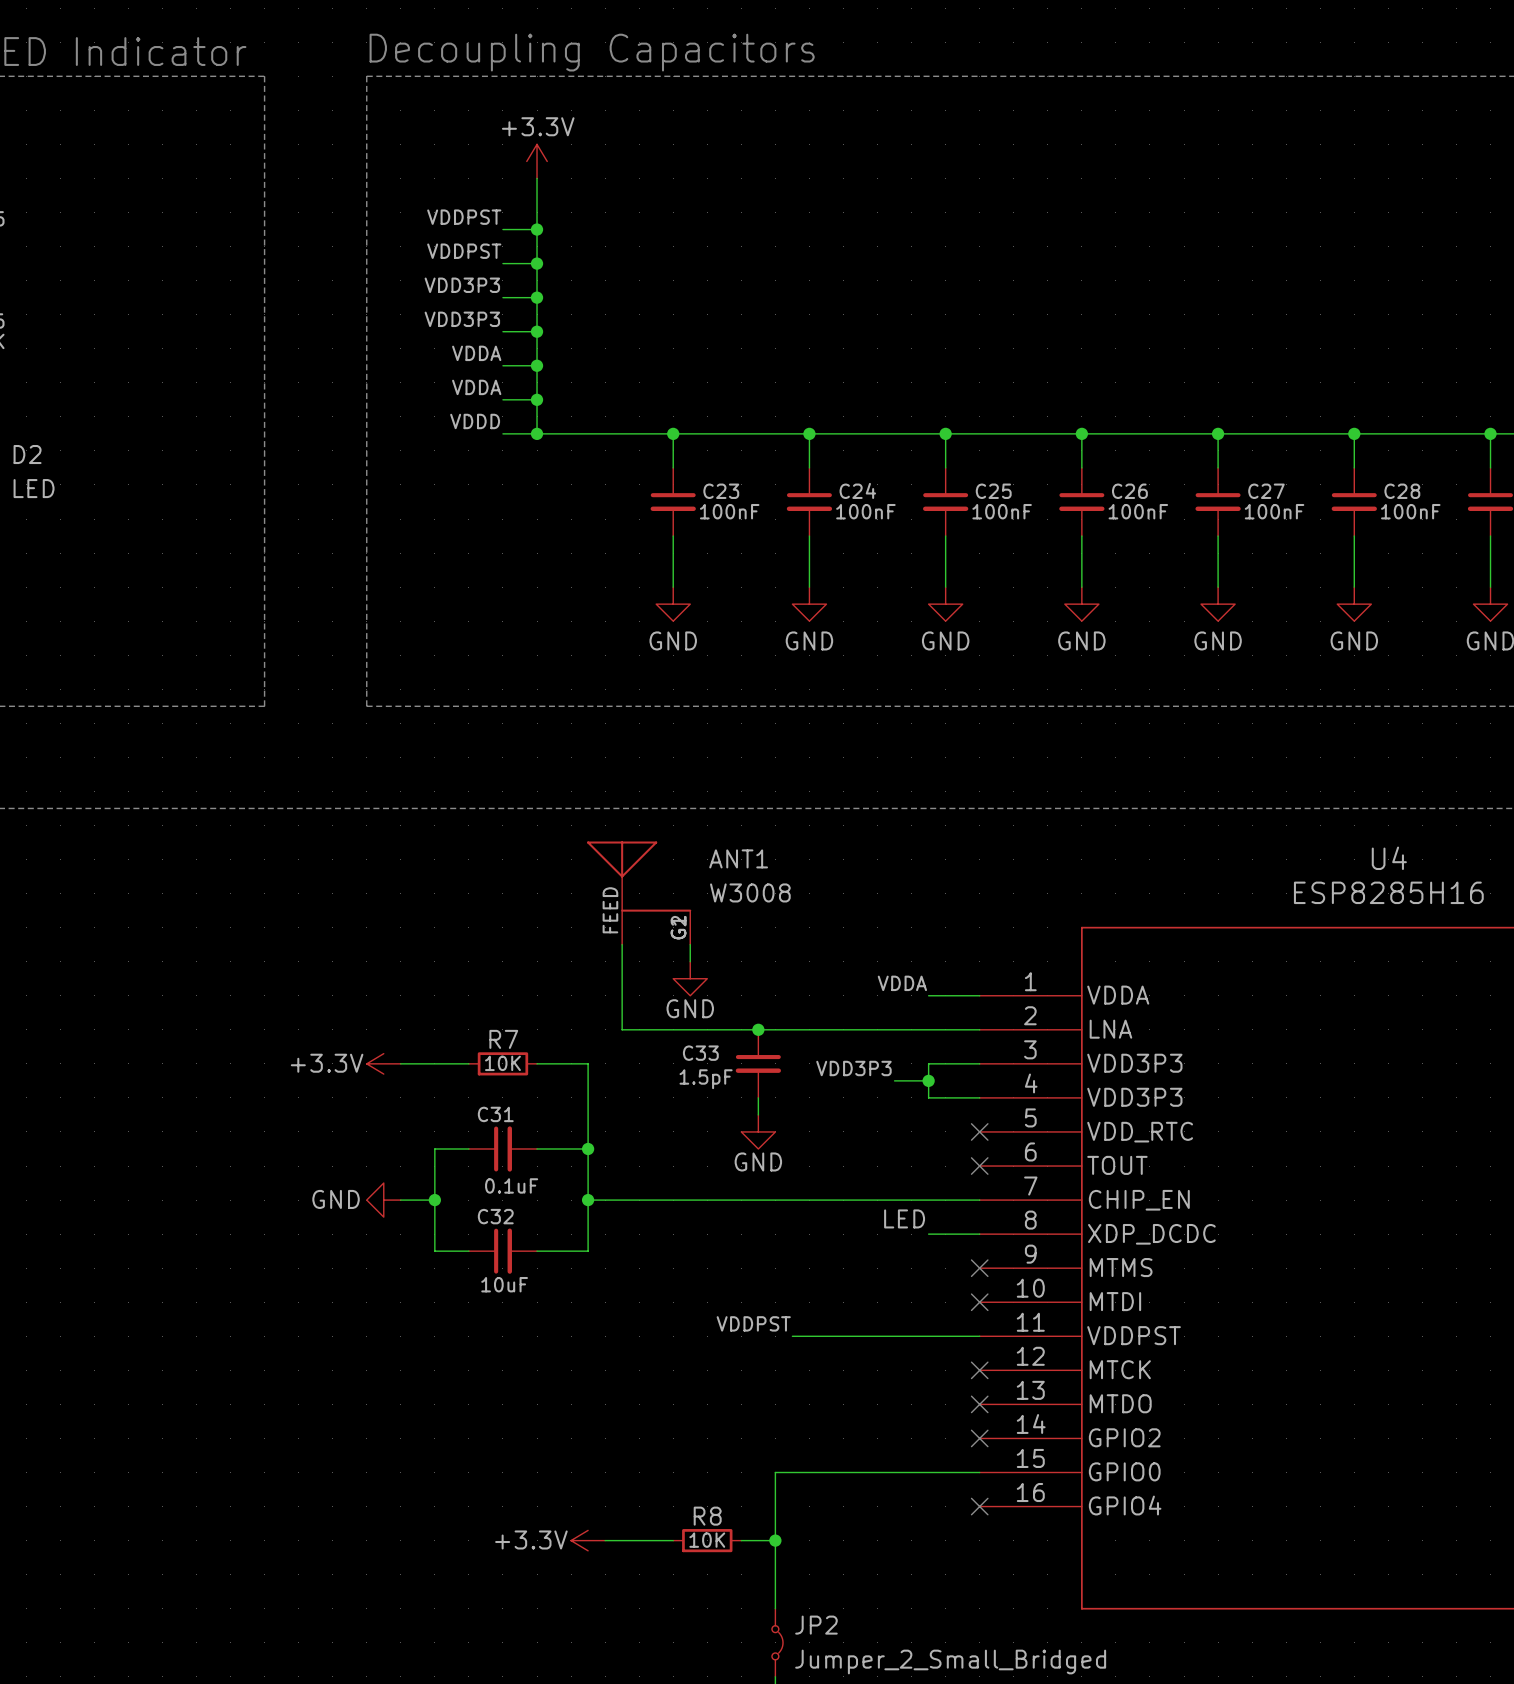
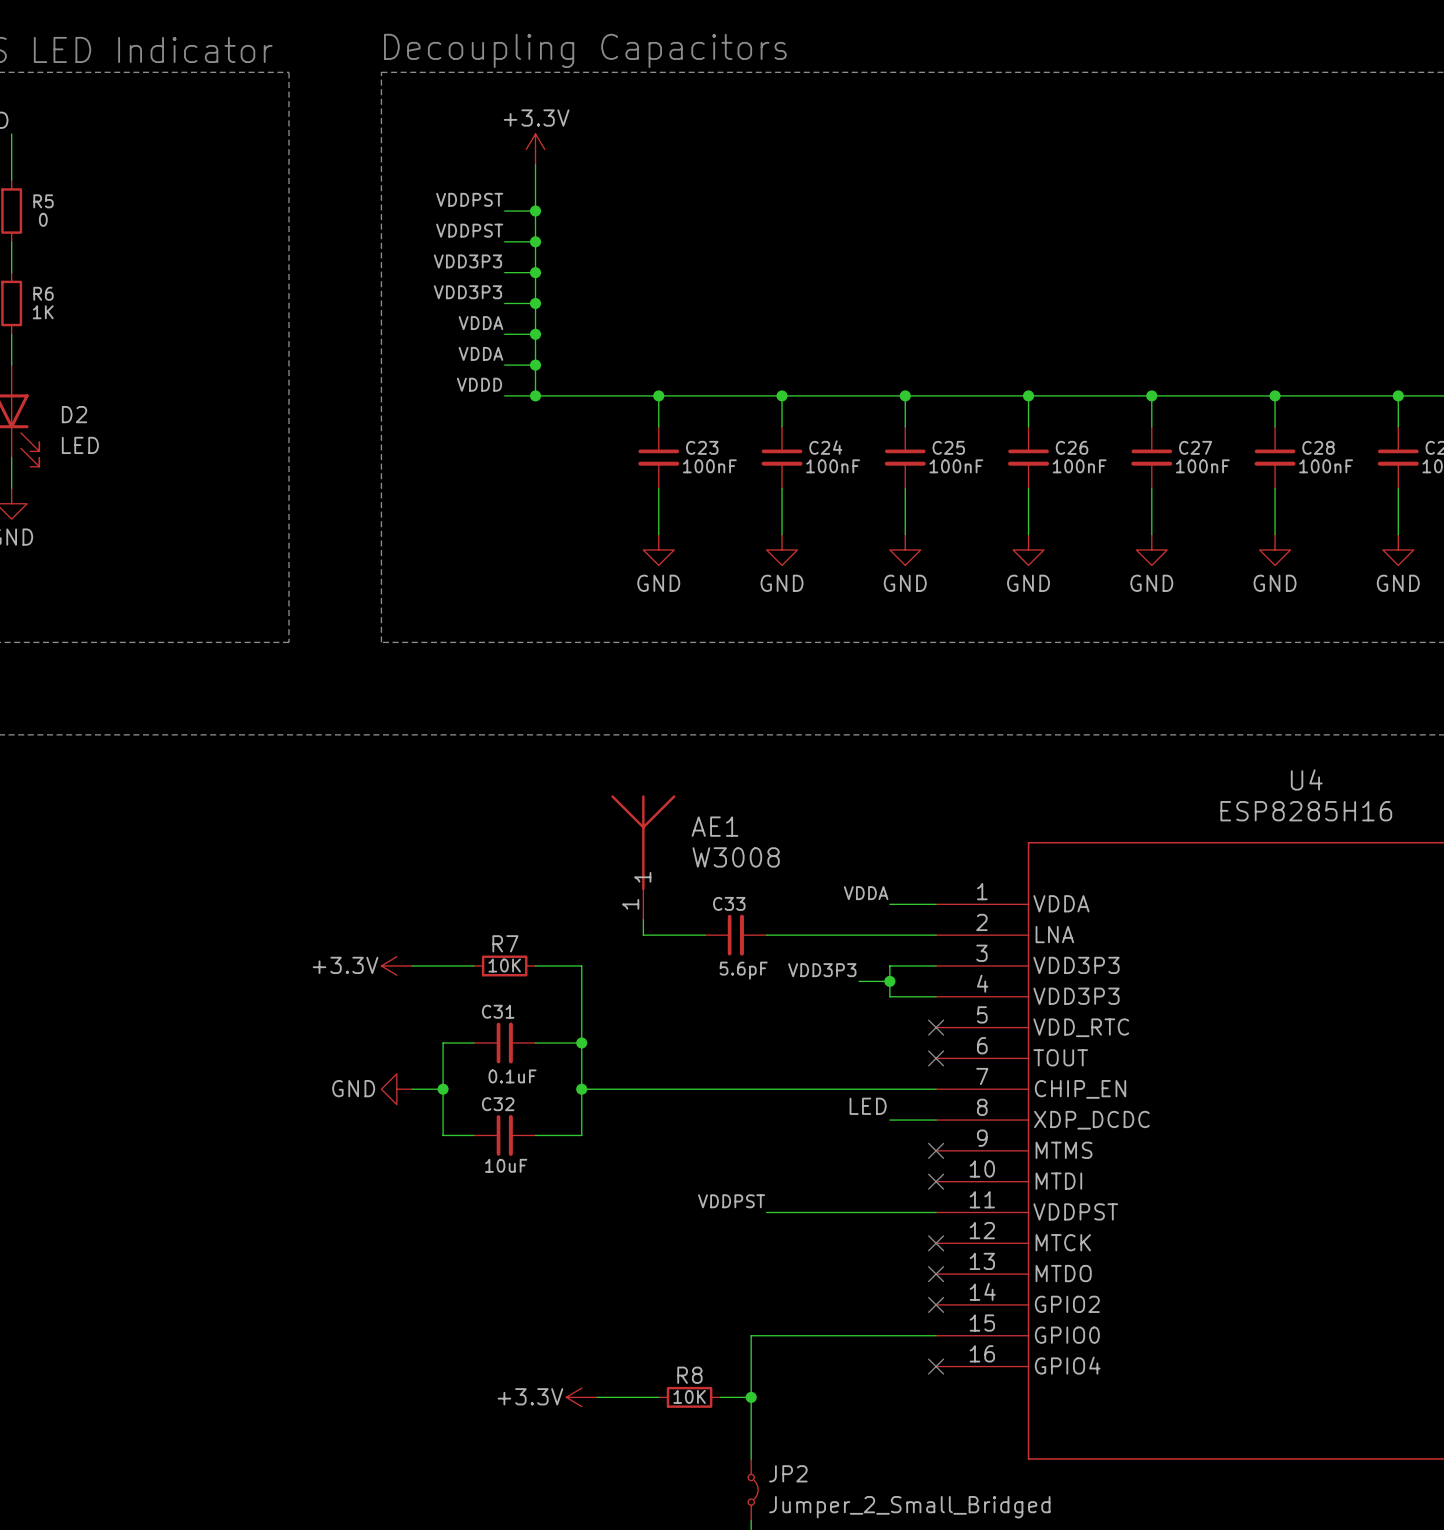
ANT1: W3008 (639, 893) -> none
AE1: none -> W3008 (643, 857)
wire: (622, 944) (622, 1029) (656, 1029) -> (643, 919) (643, 935)
wire: (690, 944) (690, 961) -> none
power symbol: GND (690, 978) -> none
junction: (758, 1029) -> none
C33 name position: C33 (700, 1053) -> C33 (729, 903)
C33 rotation: 0° (758, 1063) -> 90° counterclockwise (735, 935)
C33 value: 1.5pF (706, 1079) -> 5.6pF (743, 970)
wire: (758, 1097) (758, 1114) -> none
power symbol: GND (758, 1131) -> none

